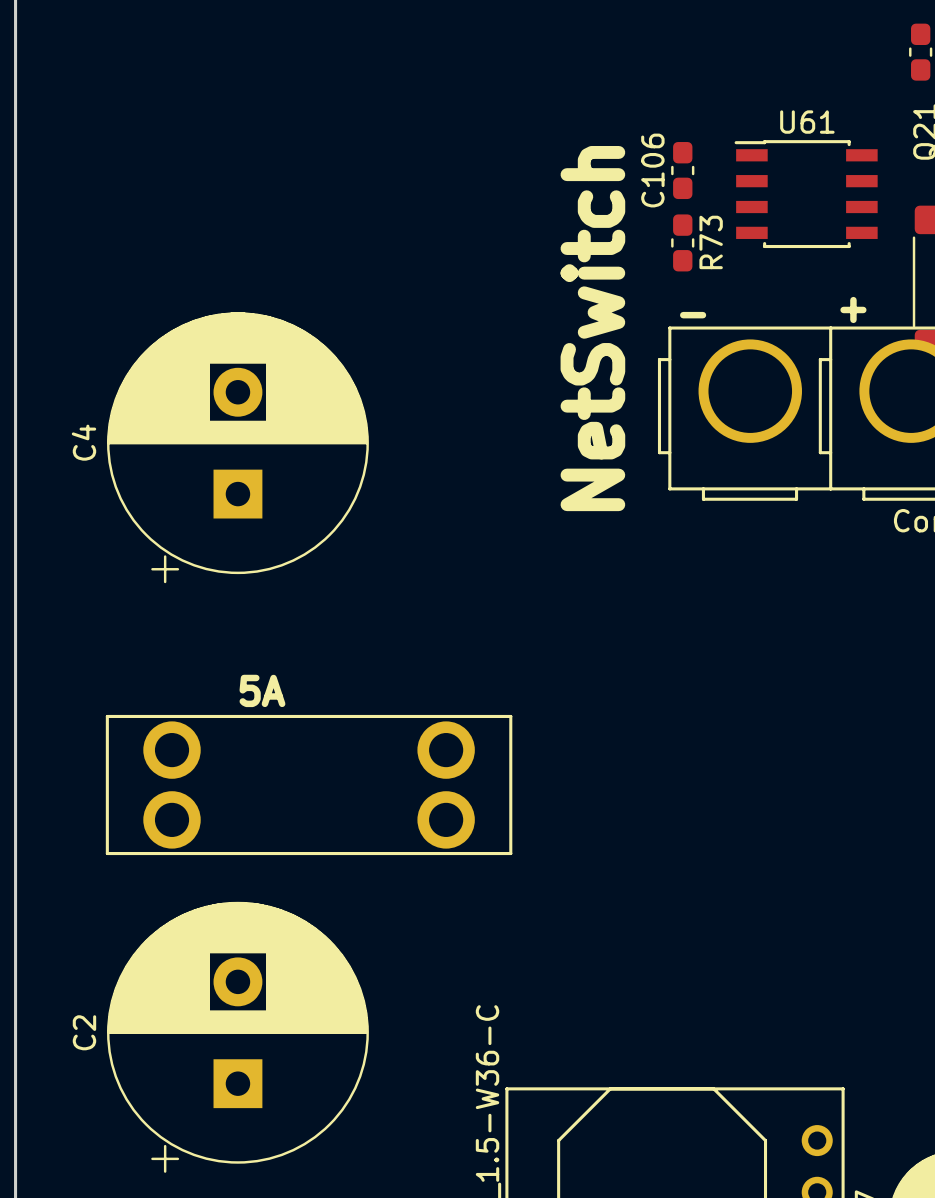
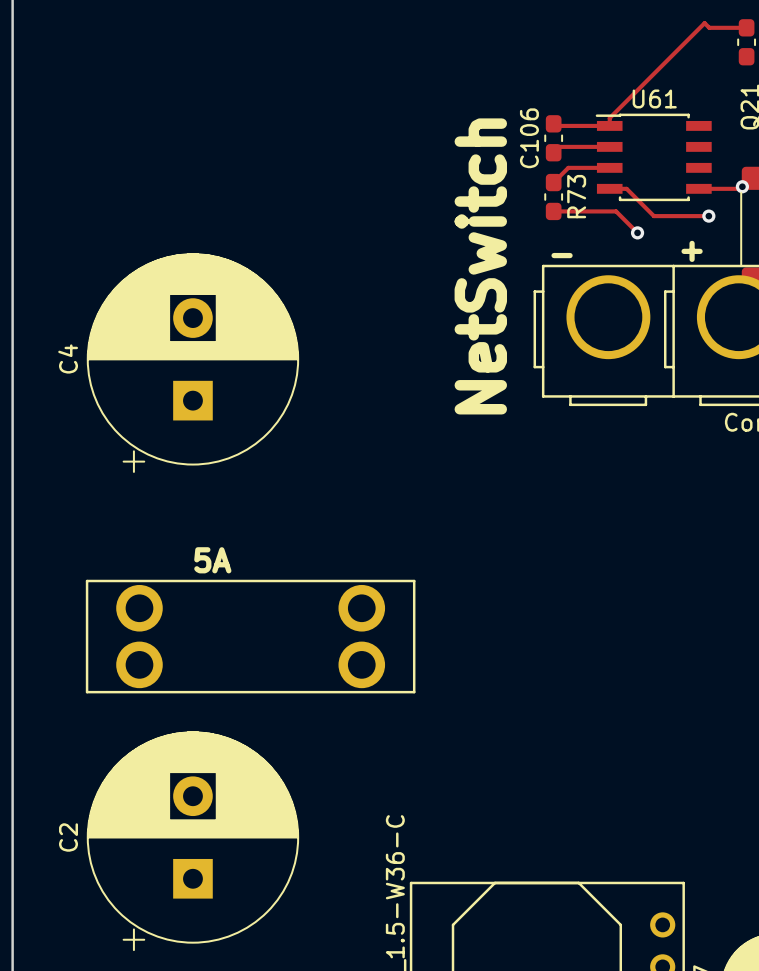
track: none -> (746, 27) (709, 27) (704, 23) (609, 118) (609, 125) (555, 125) (553, 123)
track: none -> (609, 146) (559, 146) (553, 152)
track: none -> (609, 167) (568, 167) (553, 182)
track: none -> (742, 186) (740, 188) (698, 188)
via: none -> (742, 186)
track: none -> (609, 188) (626, 188) (653, 216) (708, 216)
track: none -> (553, 211) (616, 211) (637, 232)
via: none -> (708, 216)
via: none -> (637, 232)

